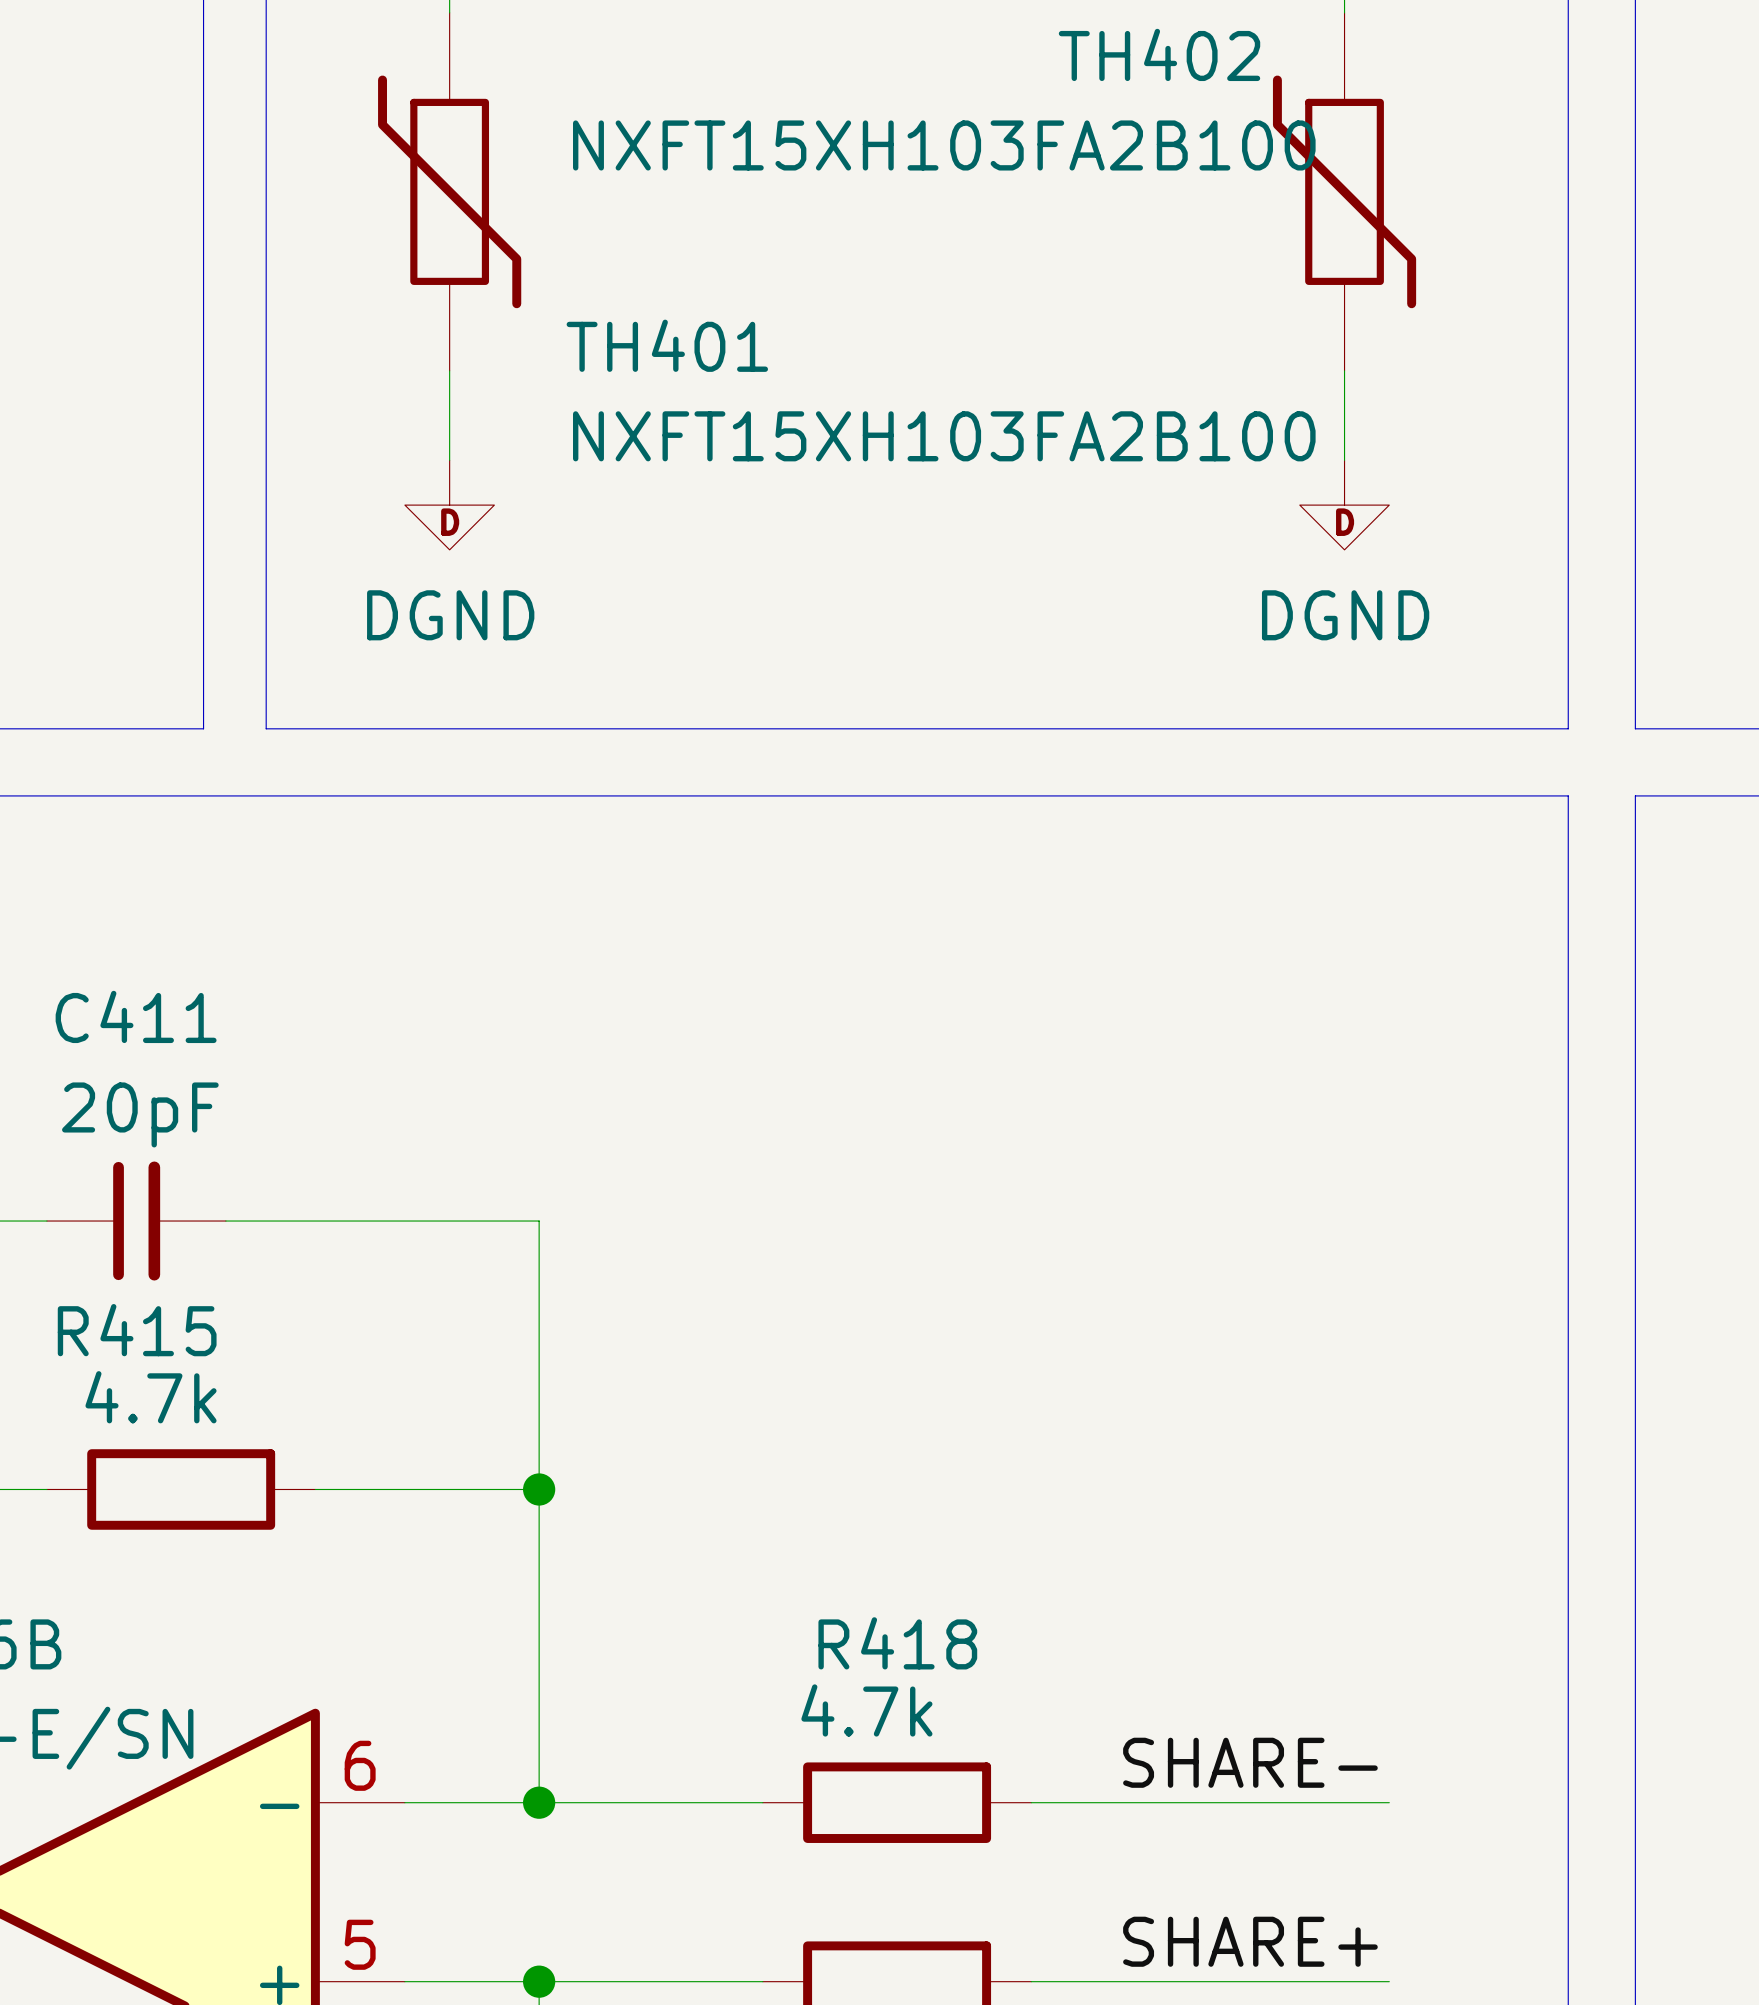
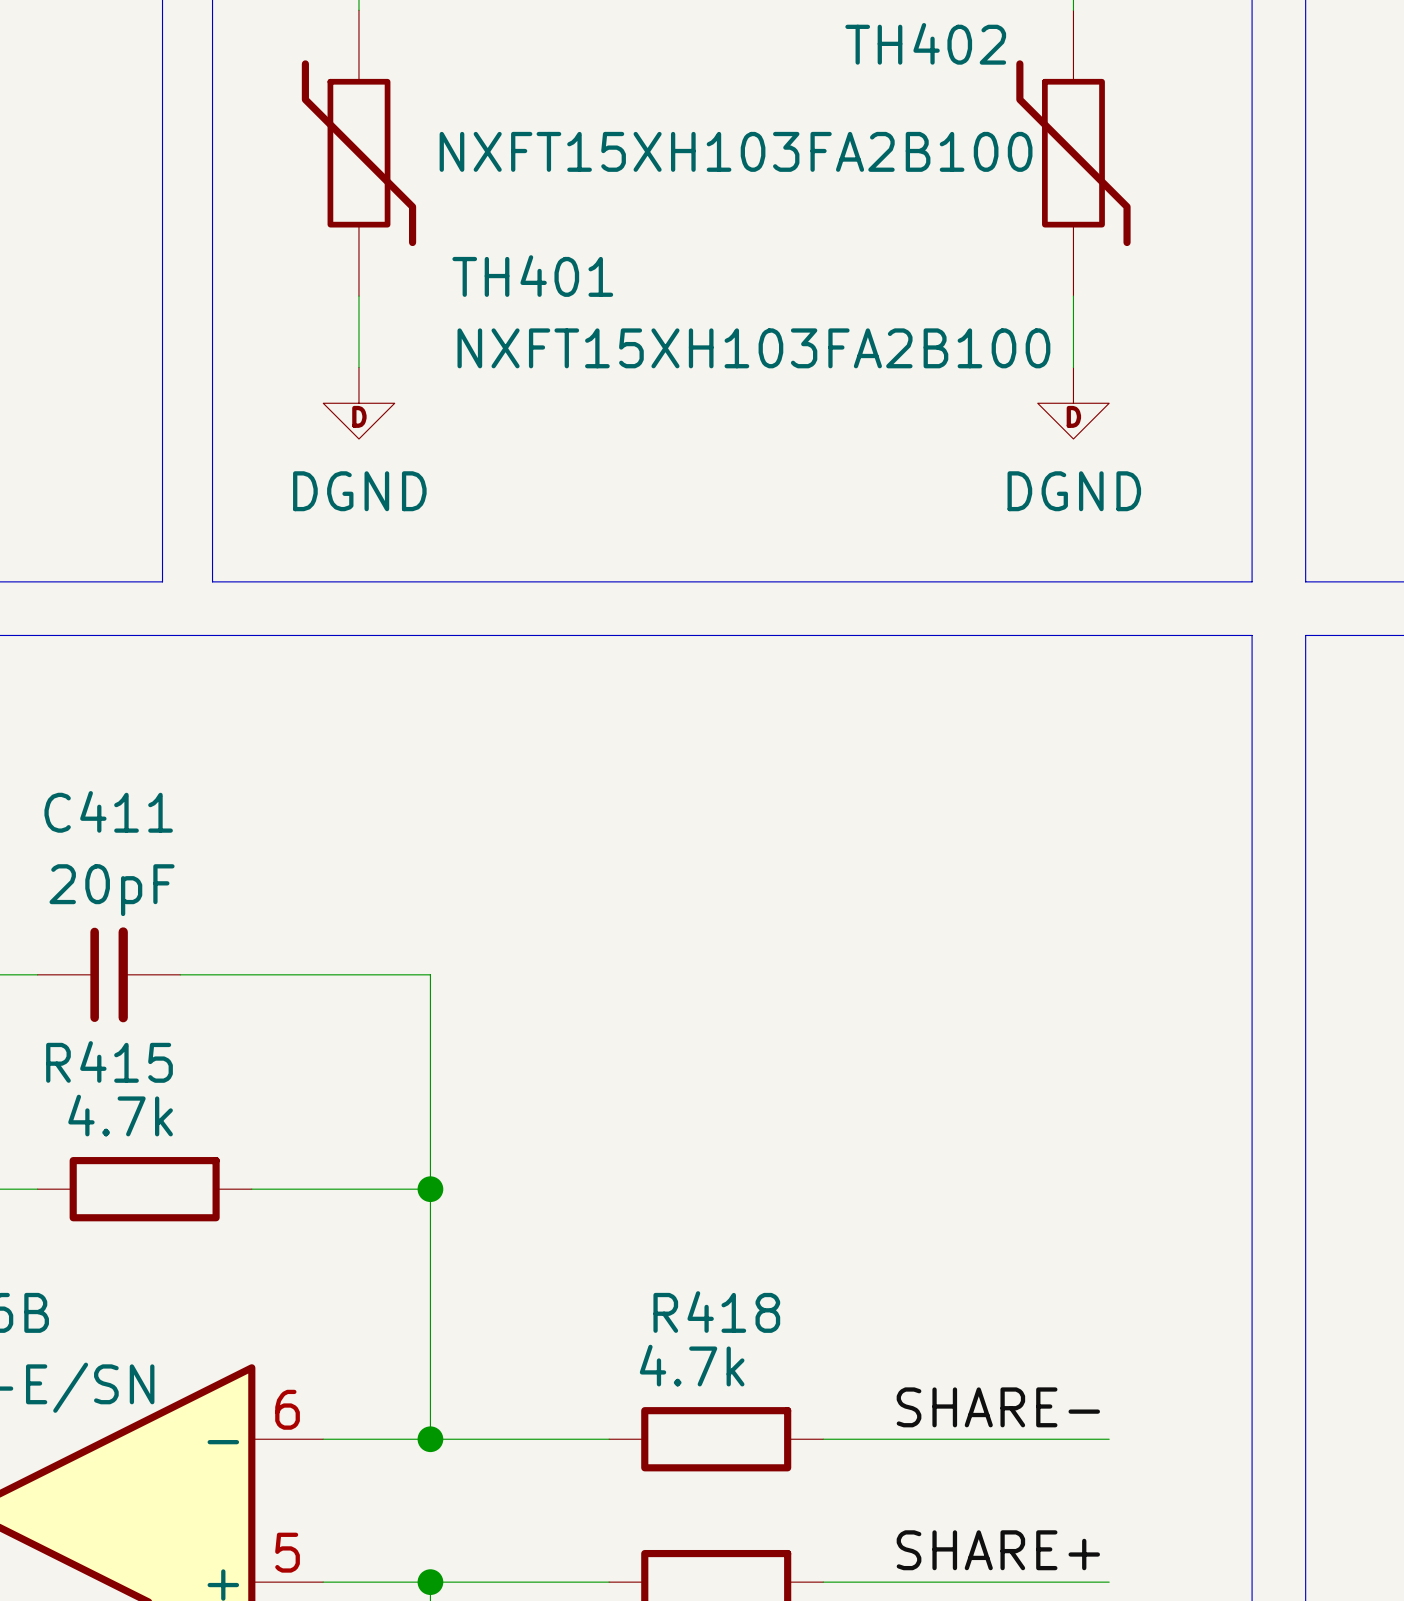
TH402 value position: NXFT15XH103FA2B100 (944, 145) -> NXFT15XH103FA2B100 (736, 151)

